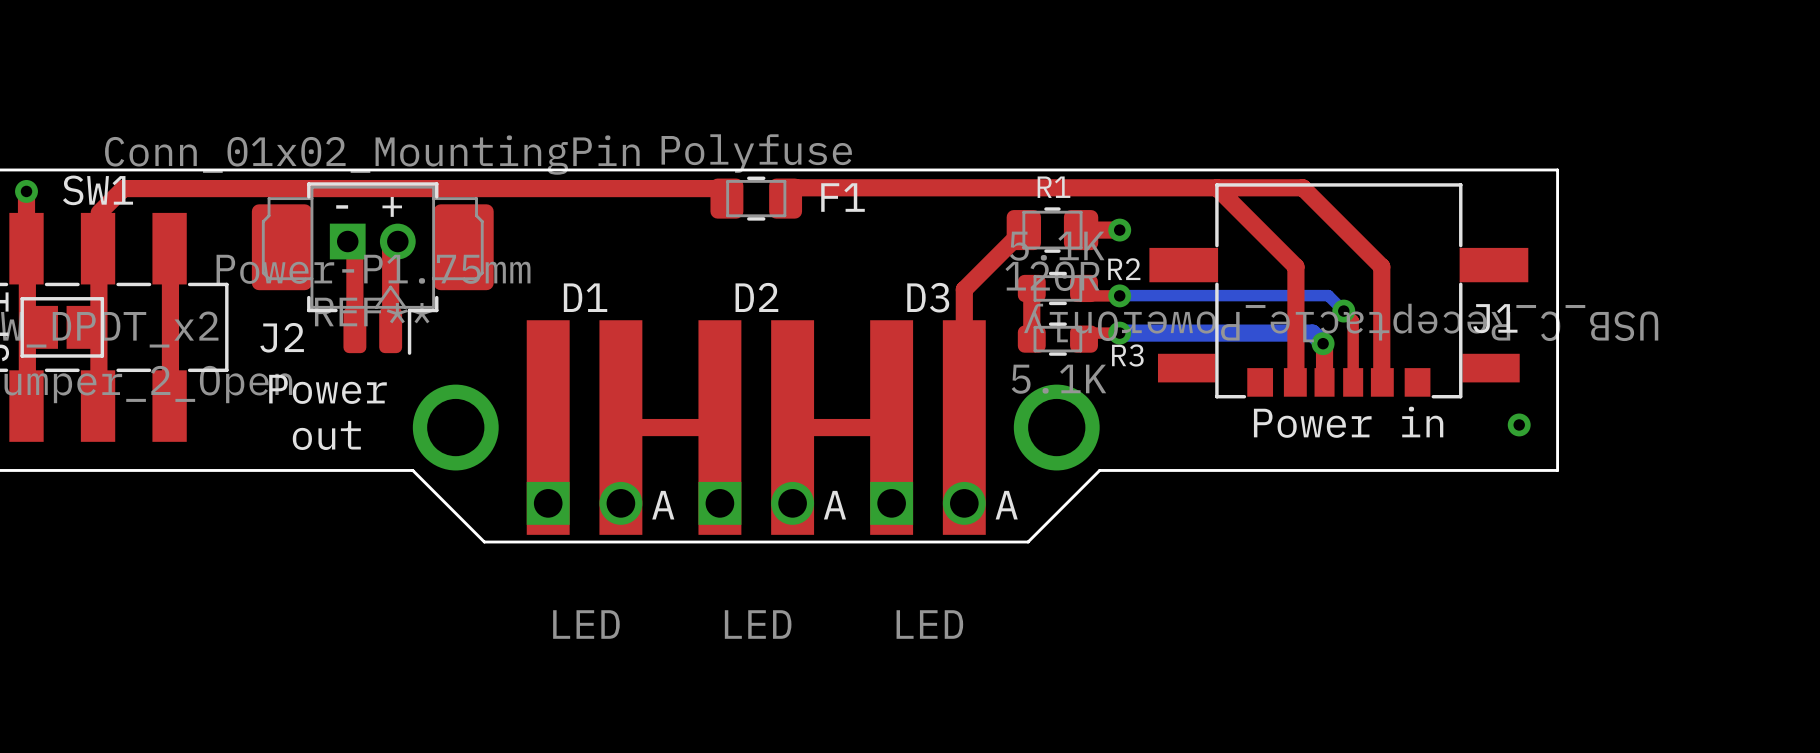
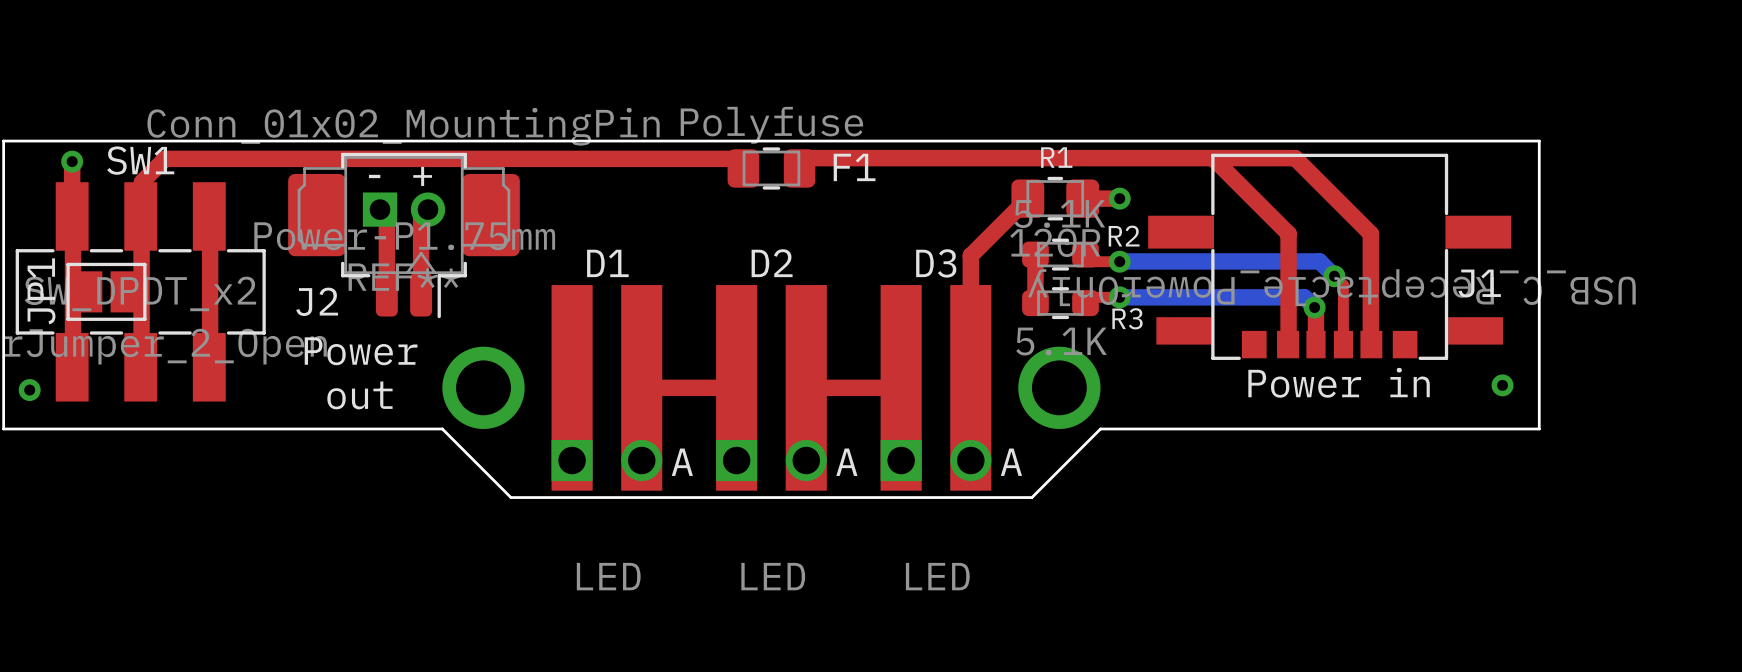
bottom track width: thin (1126, 295) (1328, 295) (1343, 311) -> thick (1125, 261) (1319, 261) (1334, 276)

